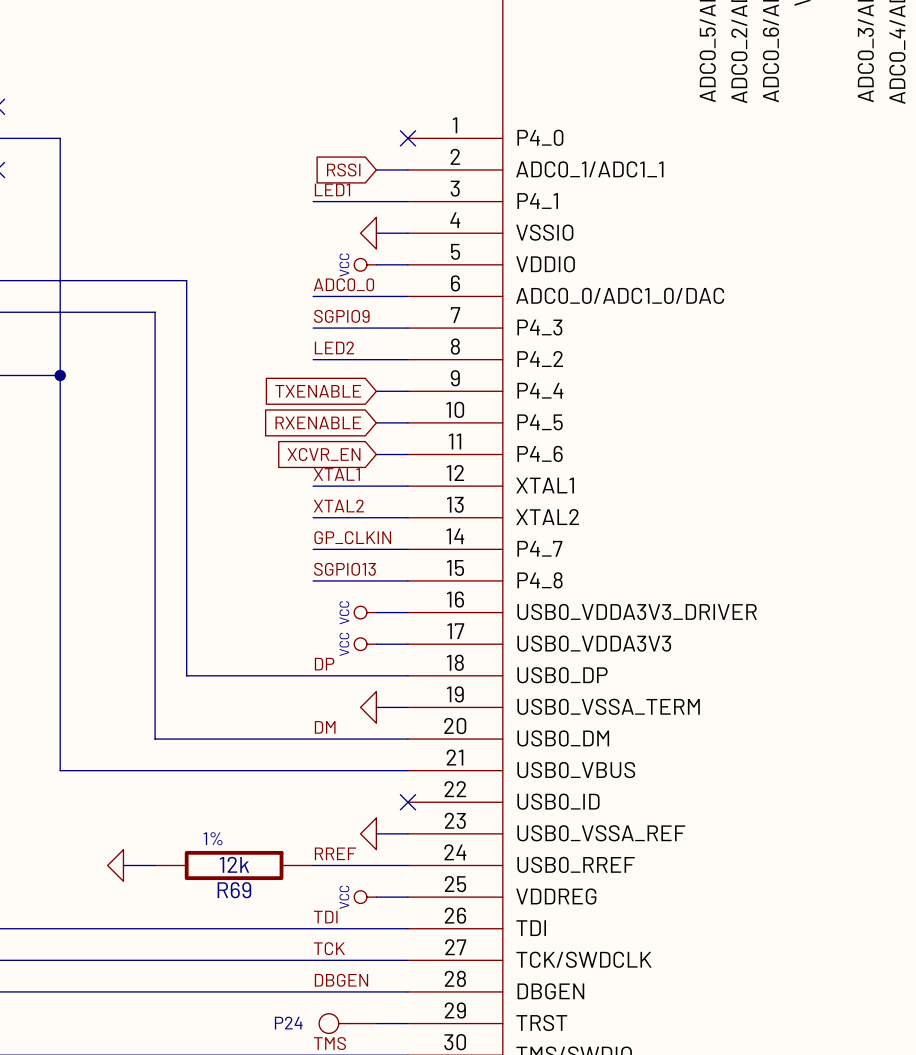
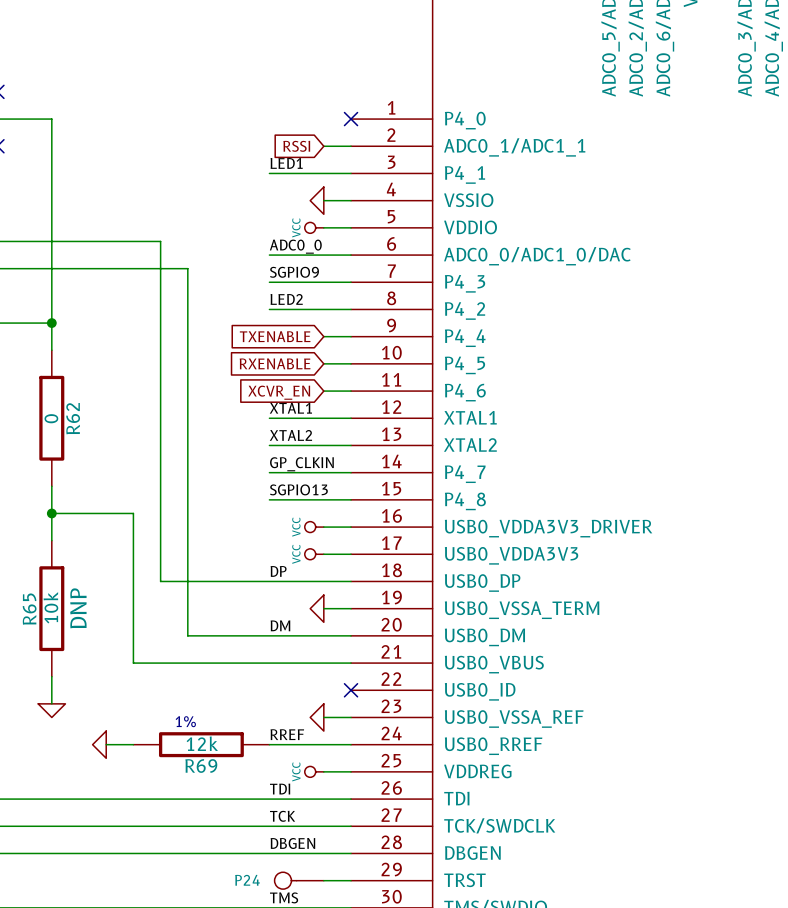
wire: (155, 312) (155, 596) -> (133, 268) (187, 268) (187, 635)
wire: (60, 407) (60, 565) -> none
R62: none -> 0 (51, 418)
wire: none -> (51, 513) (133, 513)
junction: none -> (51, 513)
wire: (60, 628) (60, 770) (155, 770) -> none
R65: none -> 10k (51, 608)
wire: (155, 739) (218, 739) -> (133, 635) (133, 663)
wire: none -> (51, 676) (51, 703)
power symbol: none -> (51, 710)

